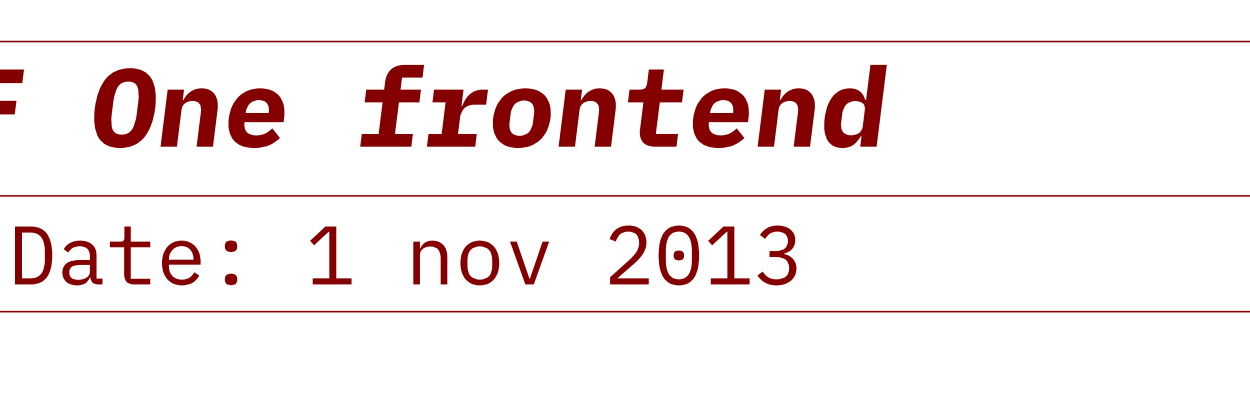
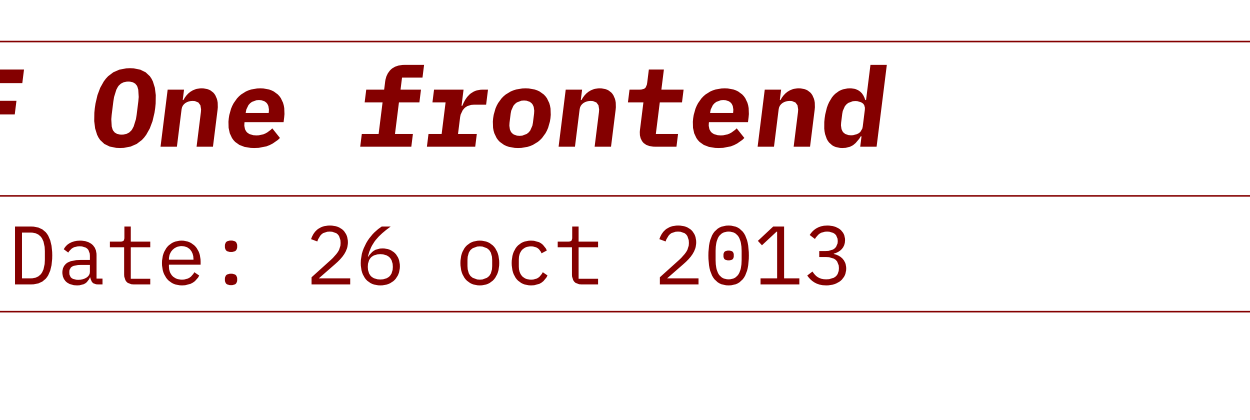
title block: Date: 1 nov 2013 (405, 255) -> Date: 26 oct 2013 (430, 255)

